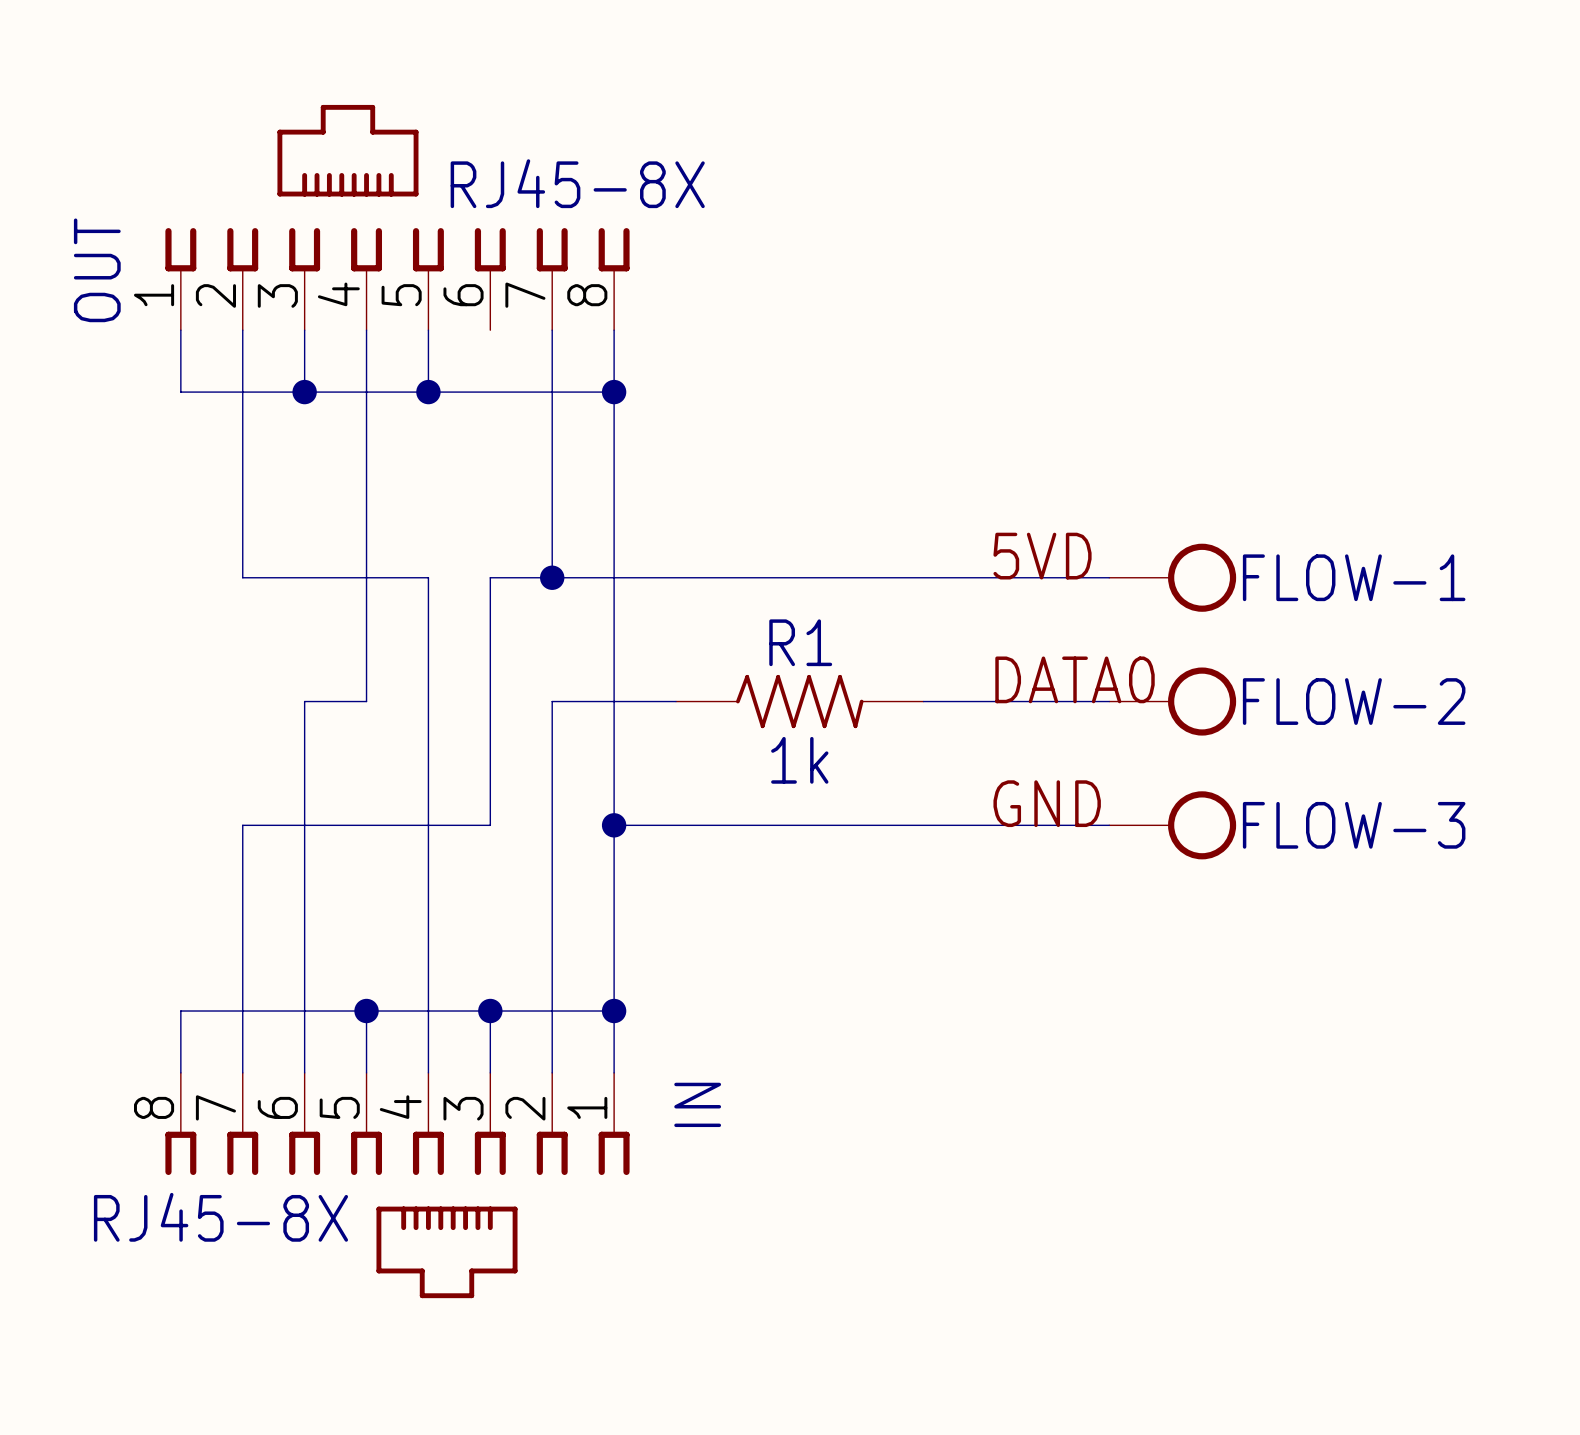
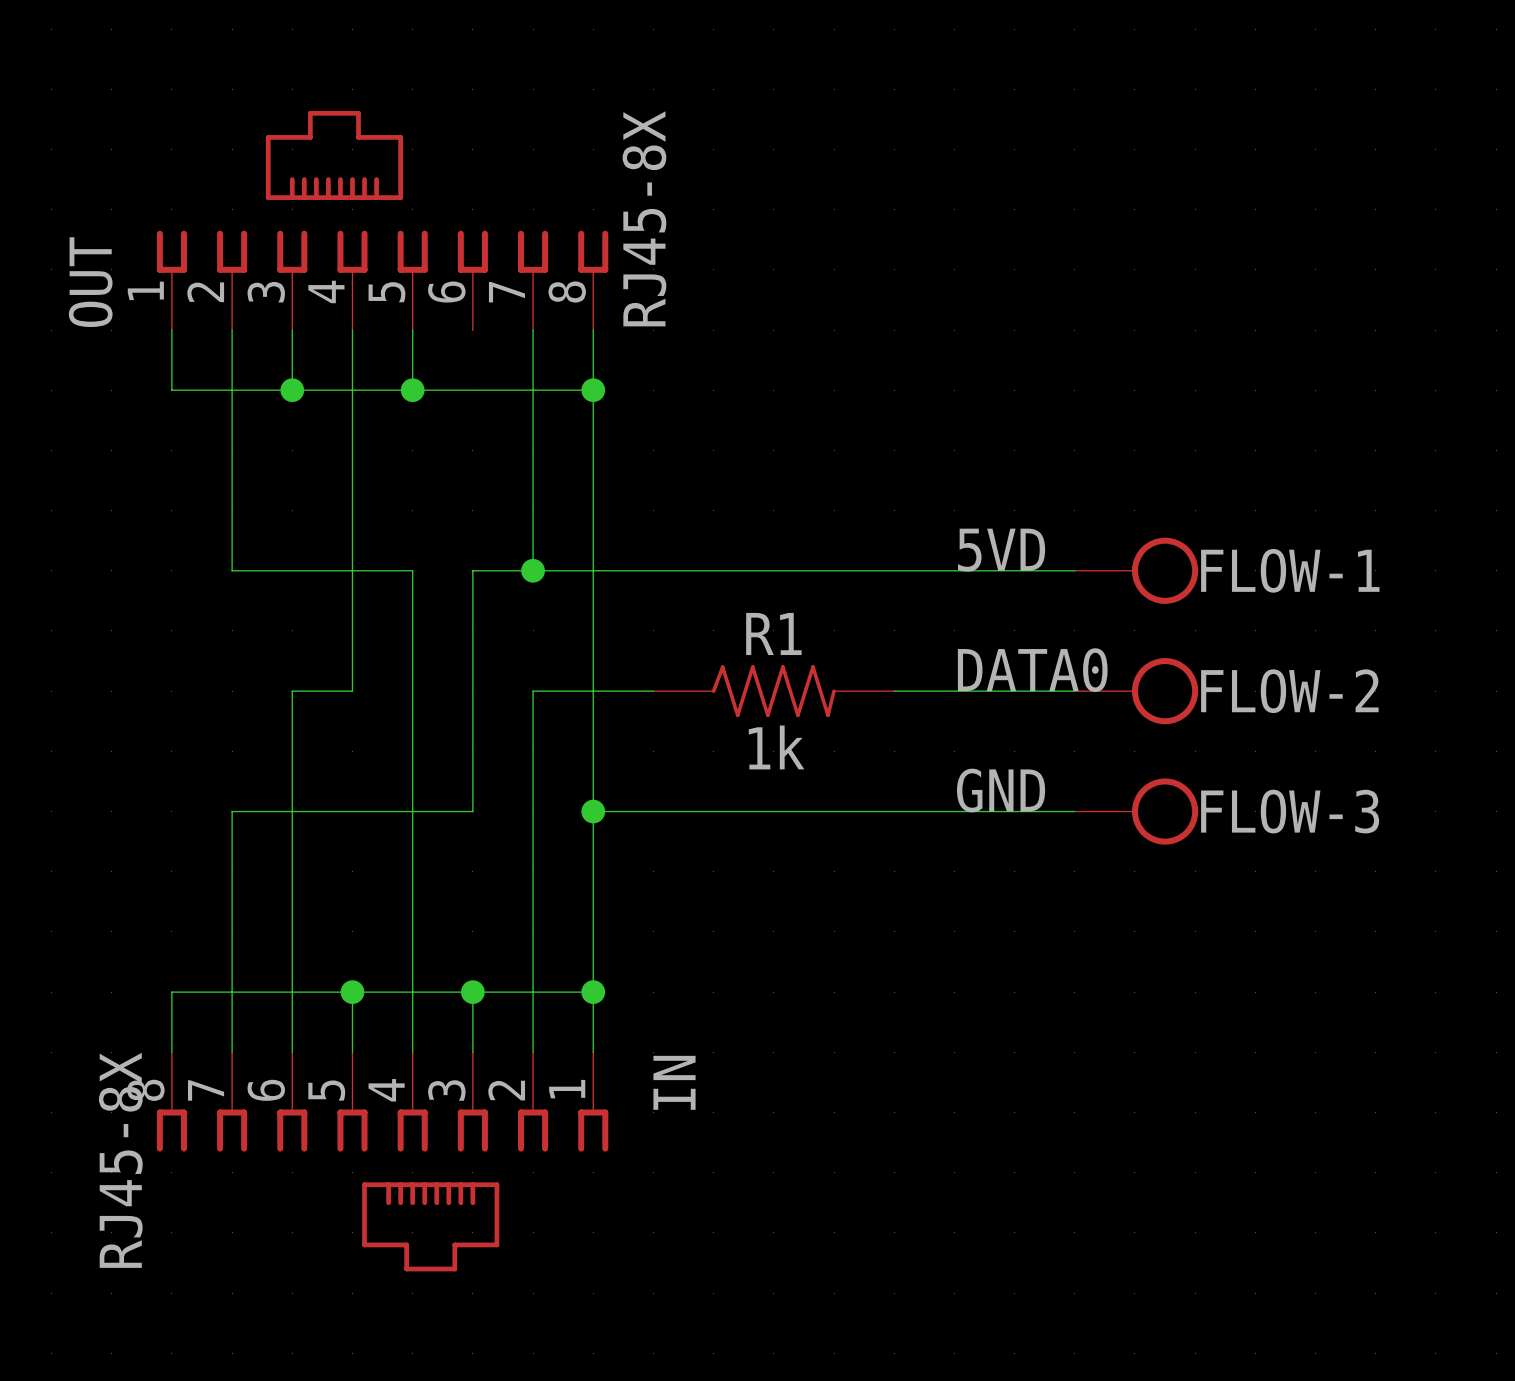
OUT value rotation: 0° (577, 183) -> 90° counterclockwise (644, 218)
IN value rotation: 0° (220, 1217) -> 90° counterclockwise (120, 1160)

